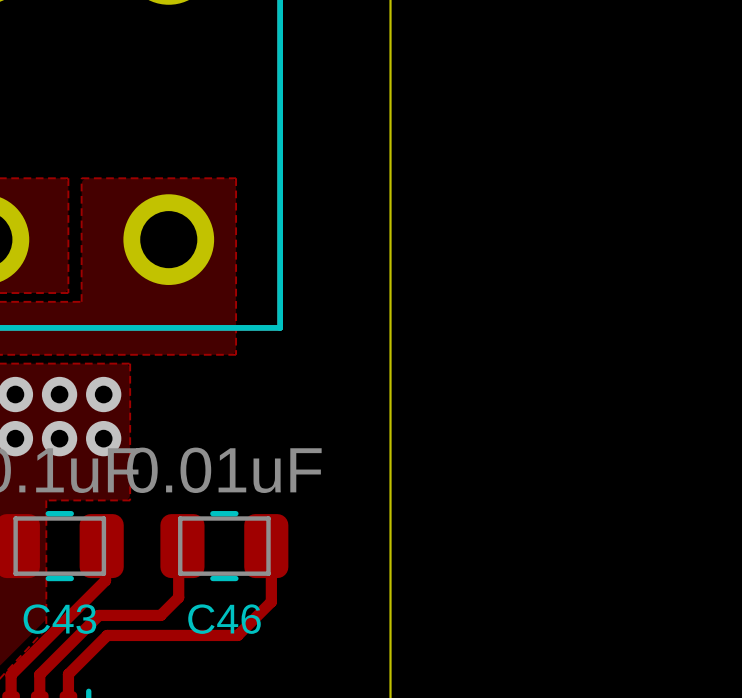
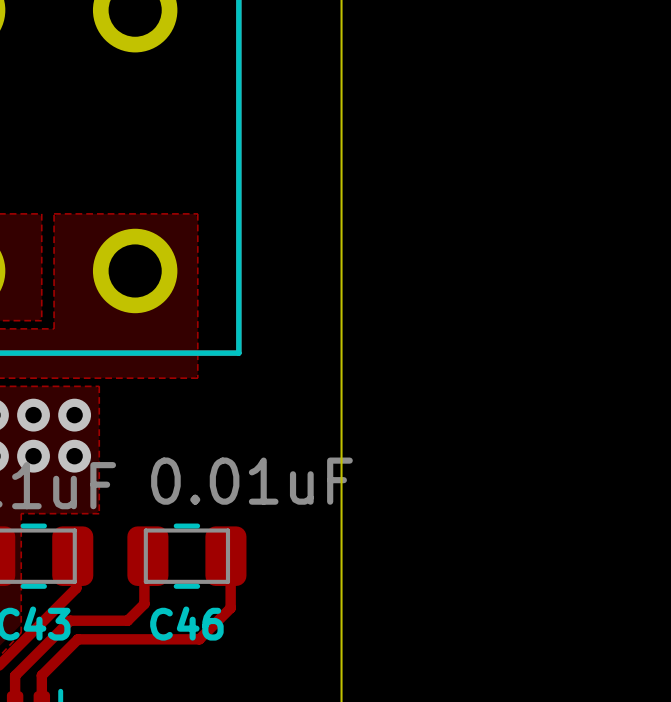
C46 value position: 0.01uF (224, 470) -> 0.01uF (251, 481)

